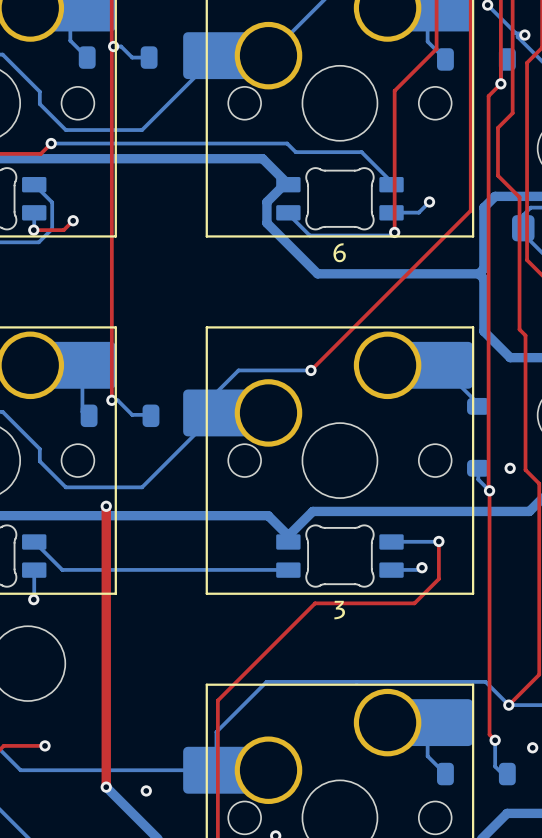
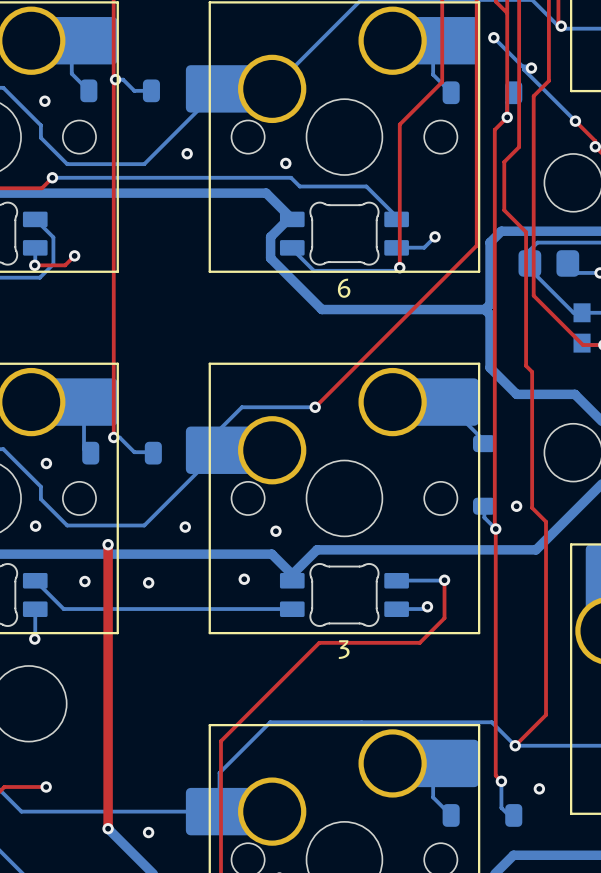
via: none -> (44, 101)
via: none -> (187, 153)
via: none -> (285, 163)
via: none -> (46, 463)
via: none -> (35, 526)
via: none -> (185, 527)
via: none -> (275, 531)
via: none -> (244, 579)
via: none -> (84, 581)
via: none -> (148, 582)

